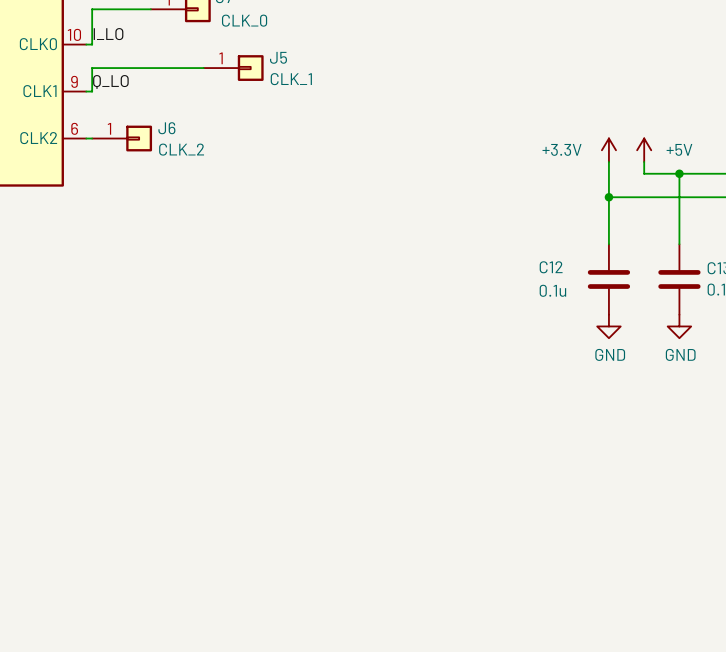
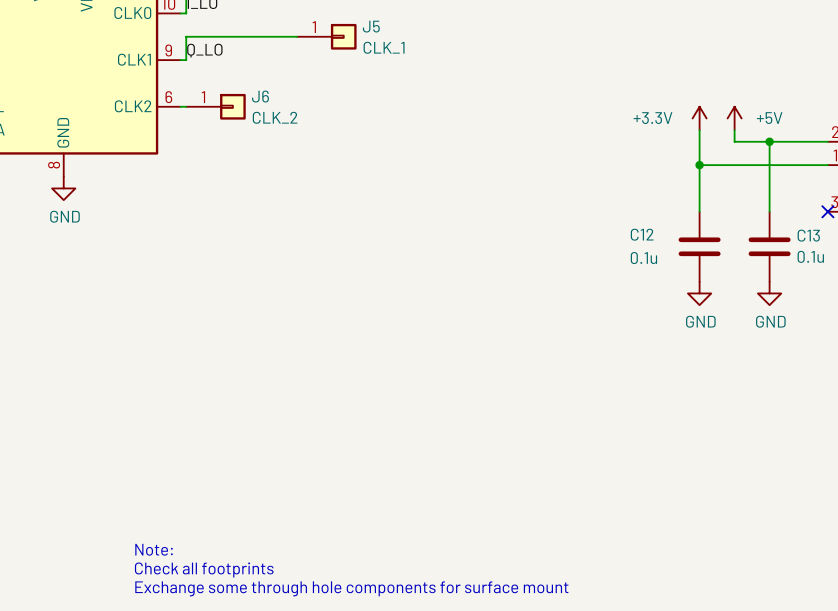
text: none -> Note: (154, 549)
text: none -> Check all footprints (204, 569)
text: none -> Exchange some through hole components for surface mount (351, 588)

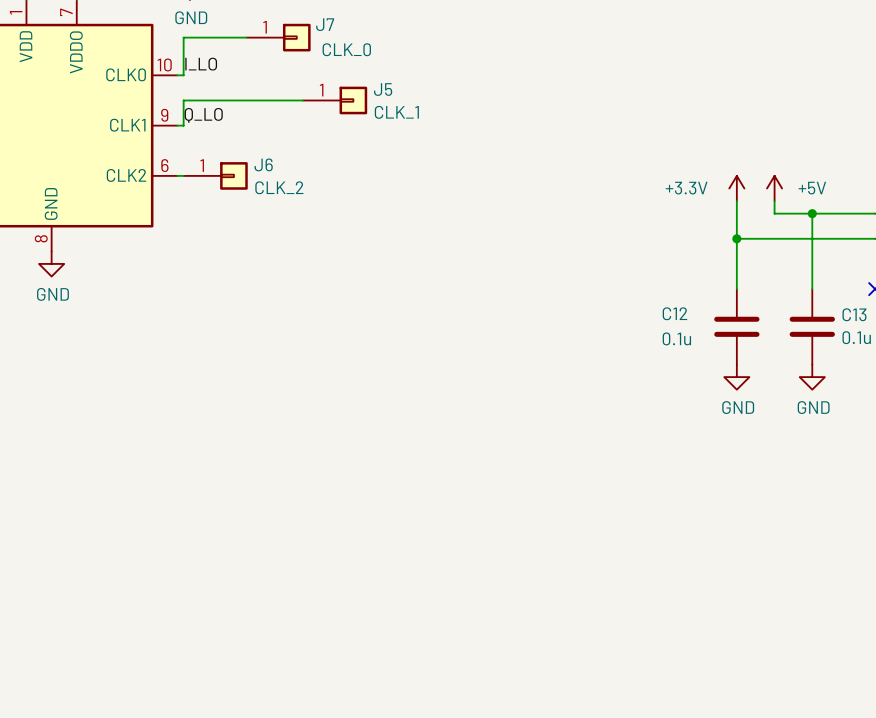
text: Note: (154, 549) -> none
text: Check all footprints (204, 569) -> none
text: Exchange some through hole components for surface mount (351, 588) -> none

